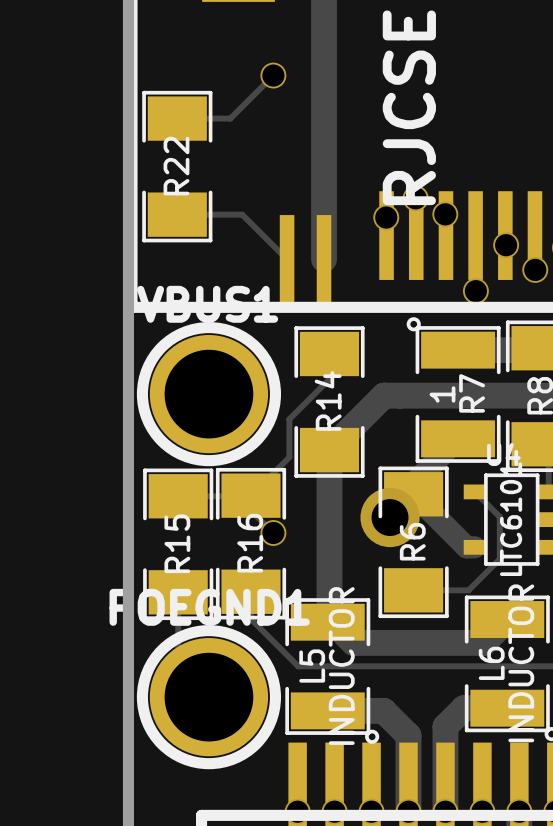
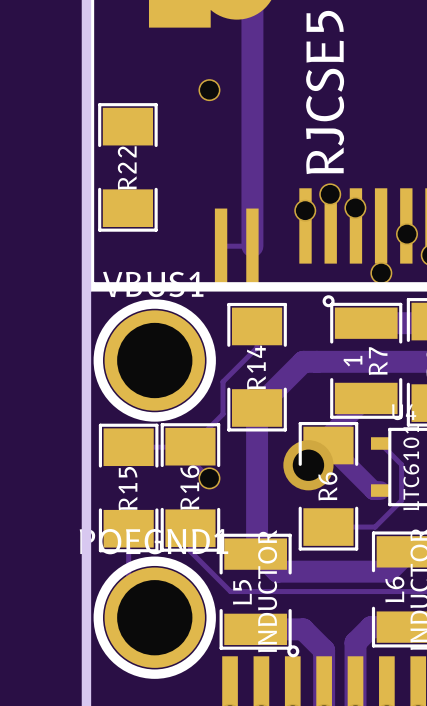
track: (273, 75) (230, 118) (177, 118) -> none
track: (177, 214) (242, 214) (287, 259) -> (252, 246) (221, 246)

